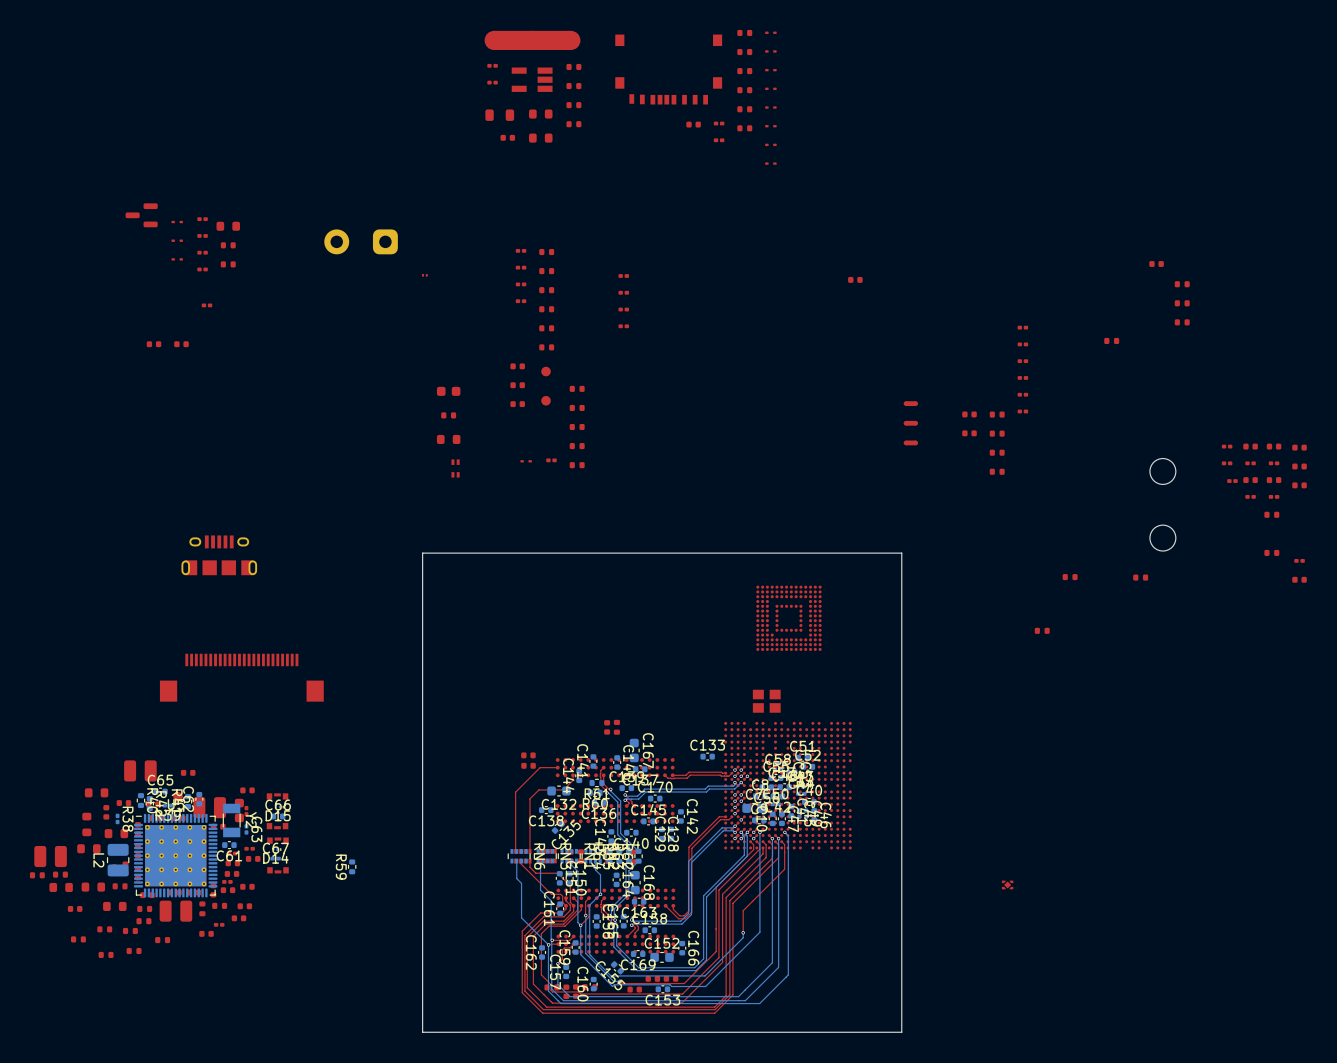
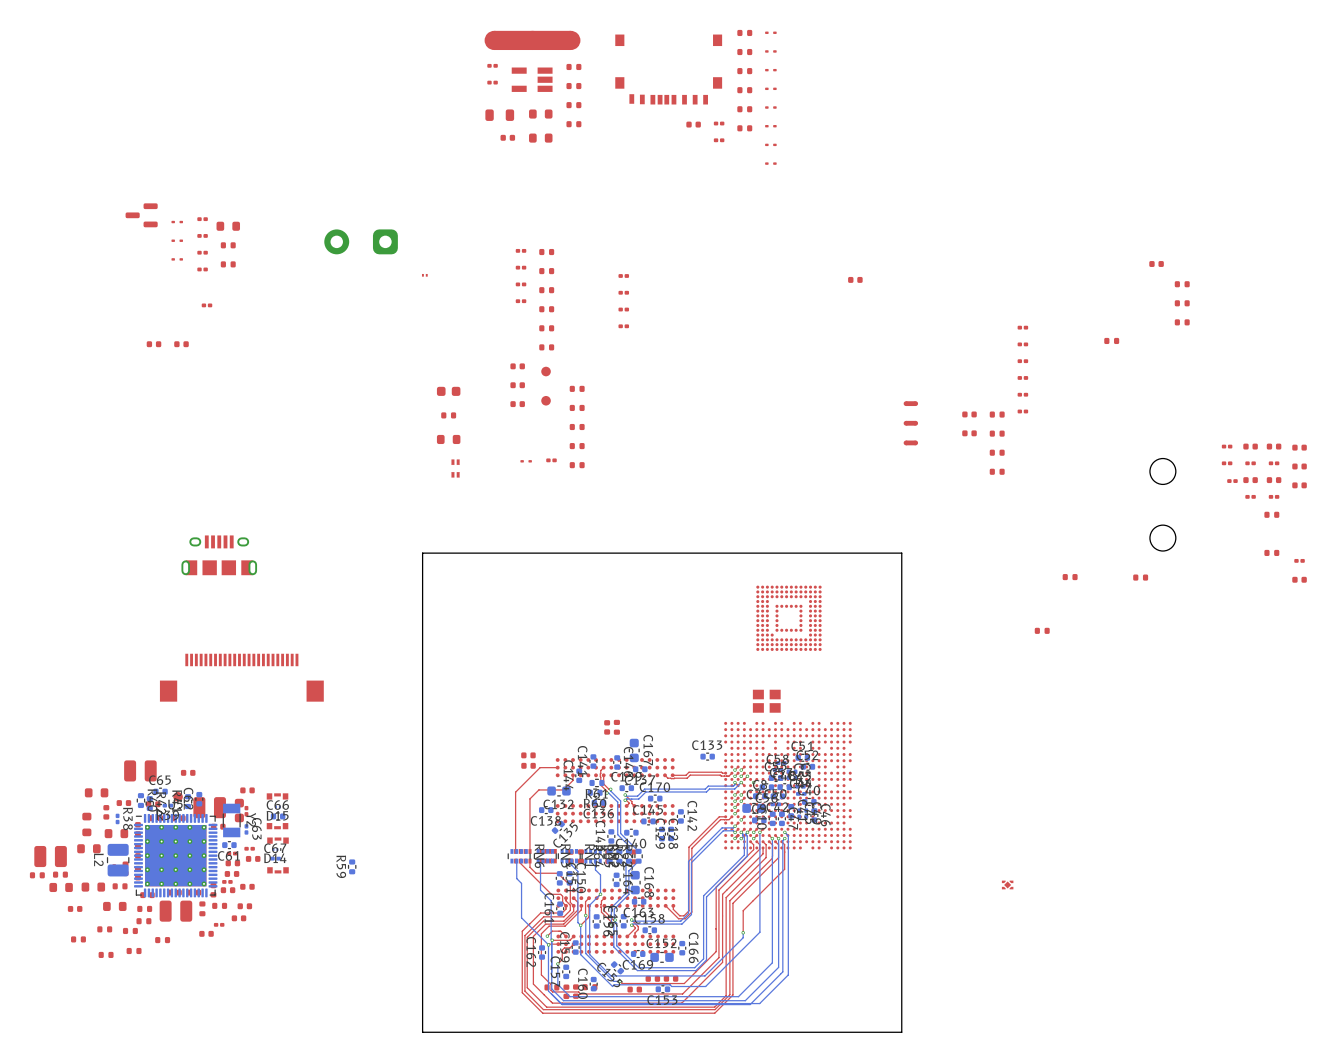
bottom track: none -> (784, 838) (782, 840) (782, 971) (750, 1004) (562, 1004) (551, 994)
via: none -> (784, 838)
top track: none -> (547, 936) (552, 931) (560, 931) (566, 936)
via: none -> (547, 936)

